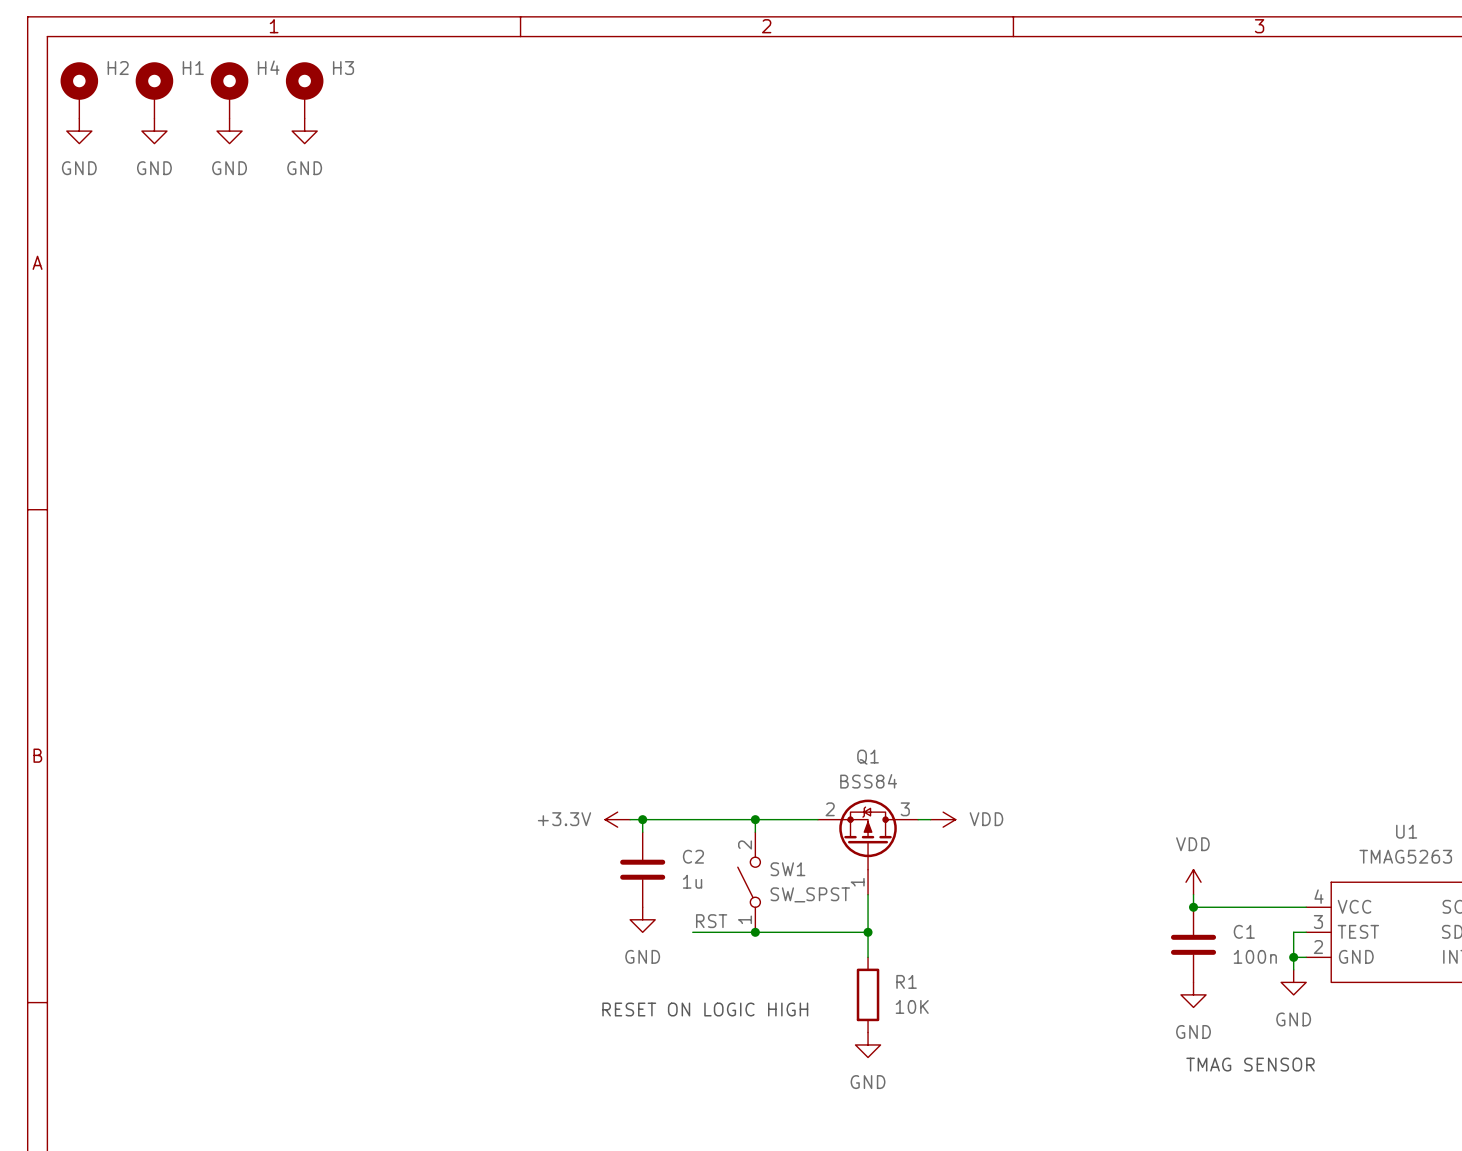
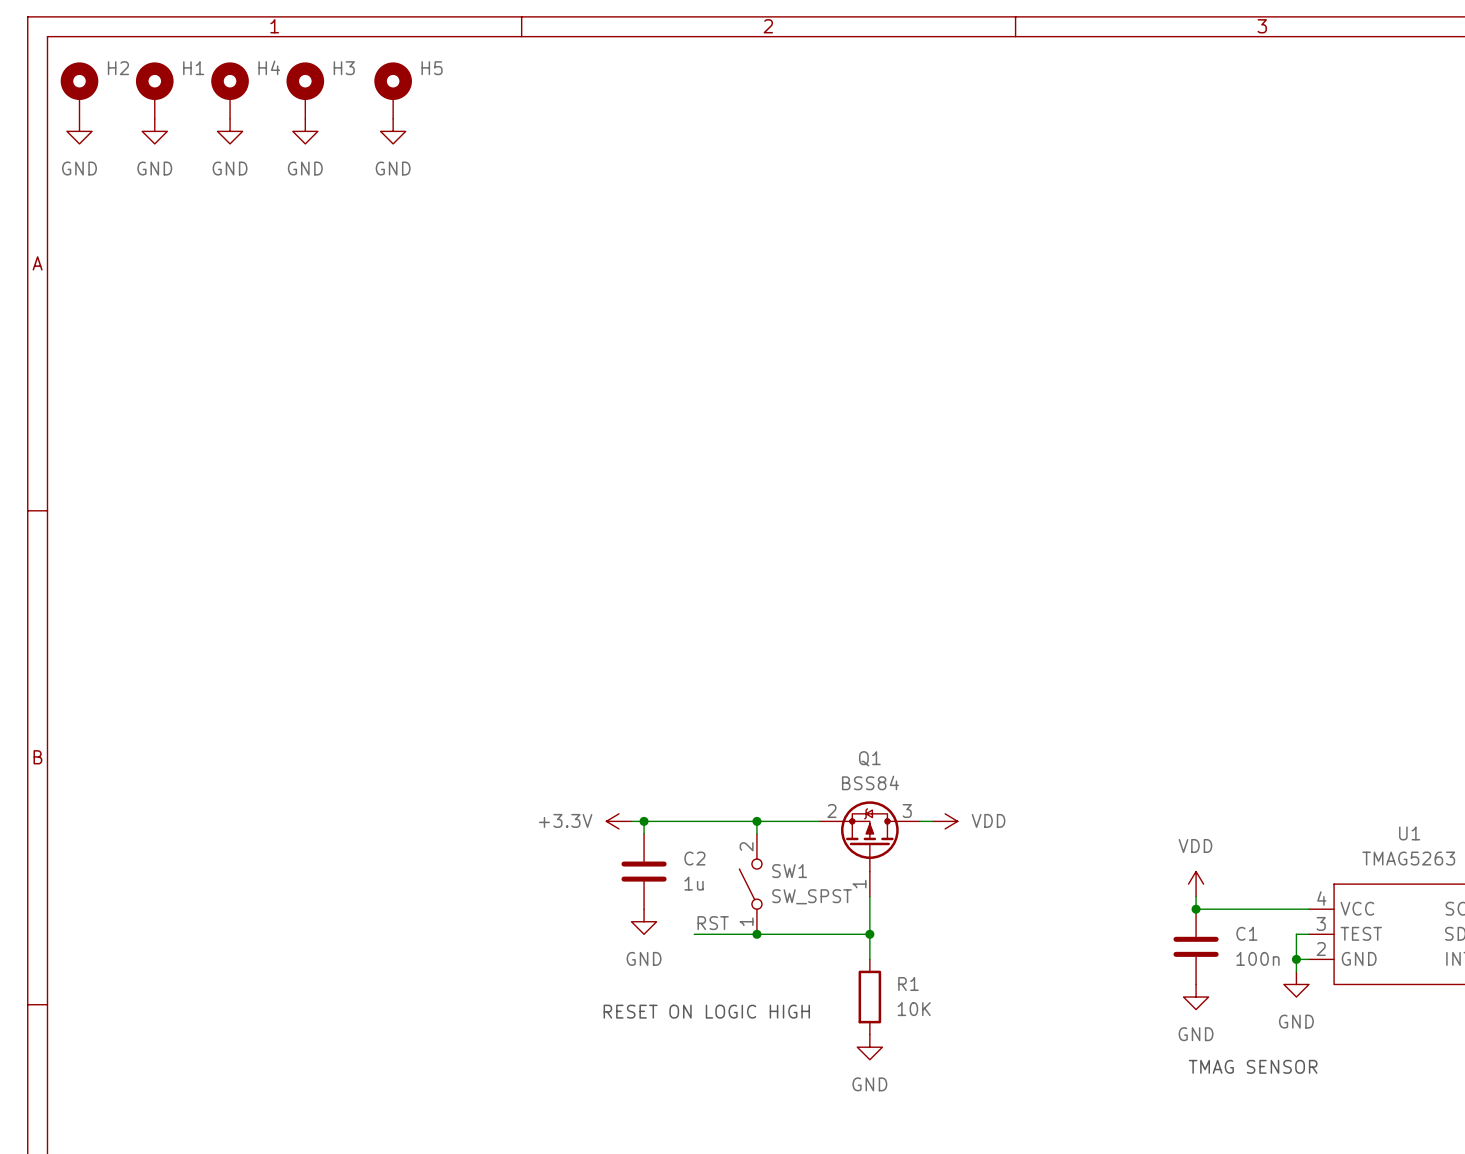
H5: none -> (393, 90)
power symbol: none -> GND (393, 131)

